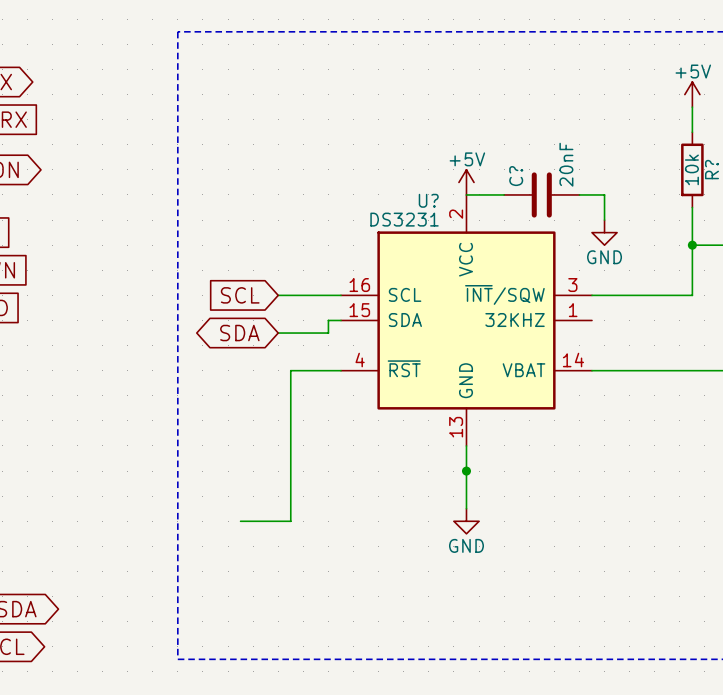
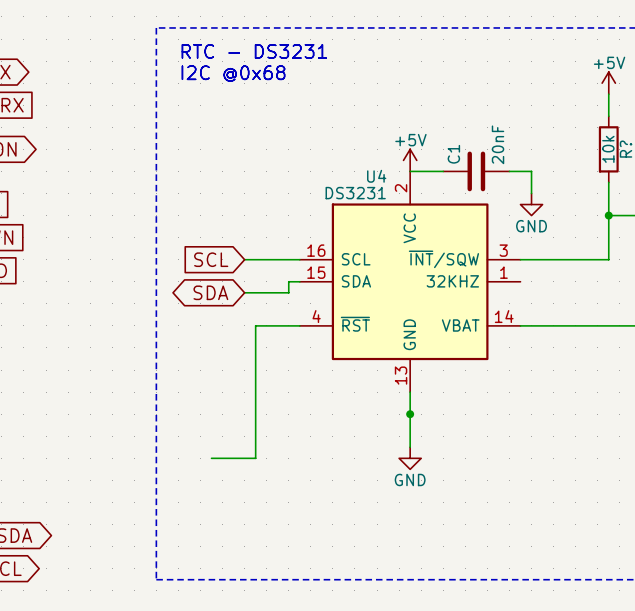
text: none -> RTC - DS3231 (254, 51)
text: none -> I2C @0x68 (233, 73)
C? name: C? (516, 176) -> C1 (453, 154)
U? name: U? (428, 200) -> U4 (376, 176)

